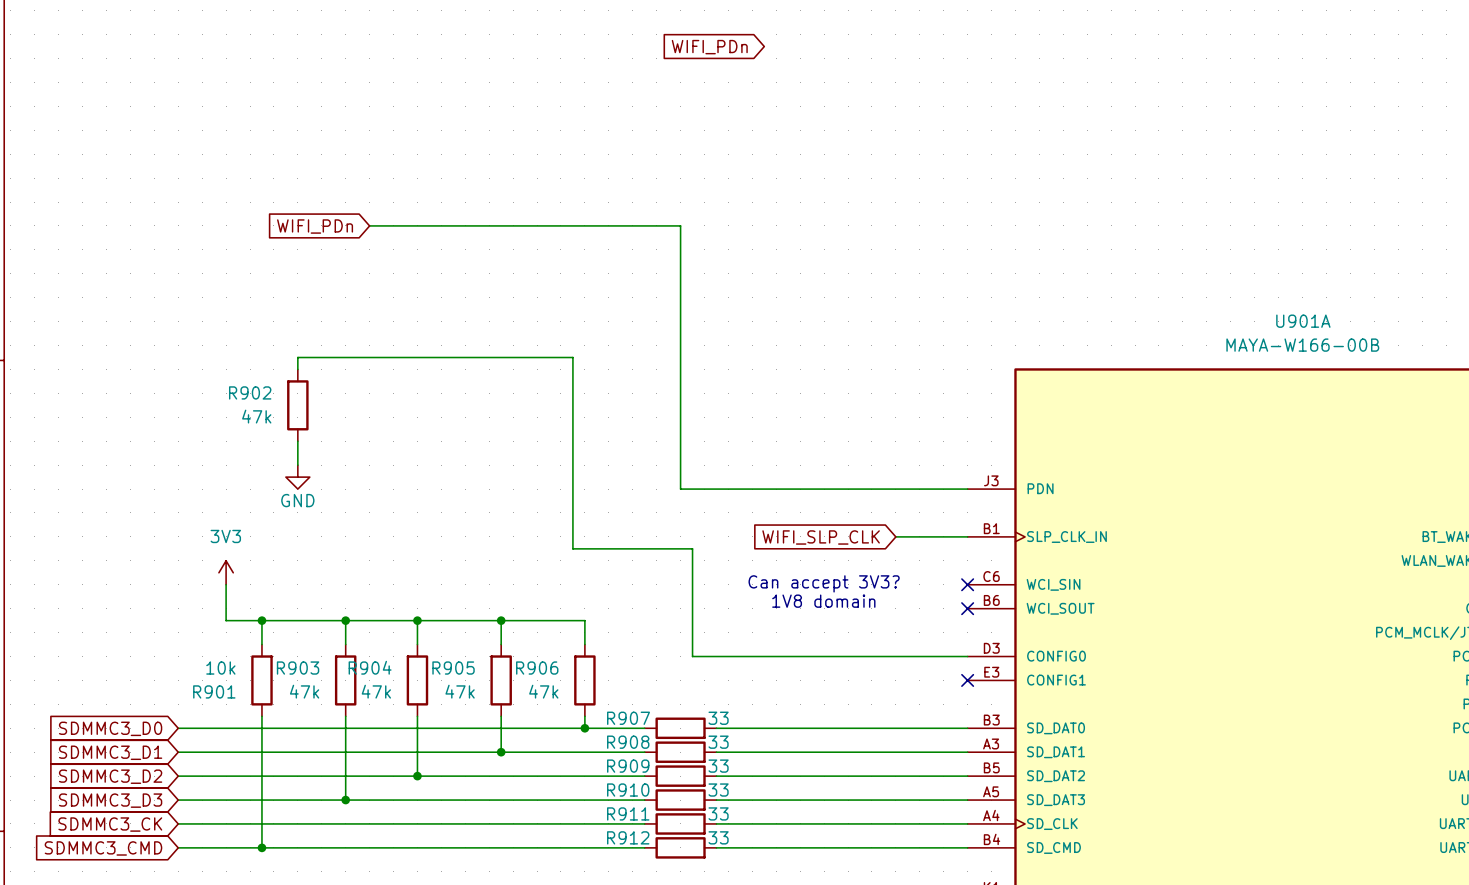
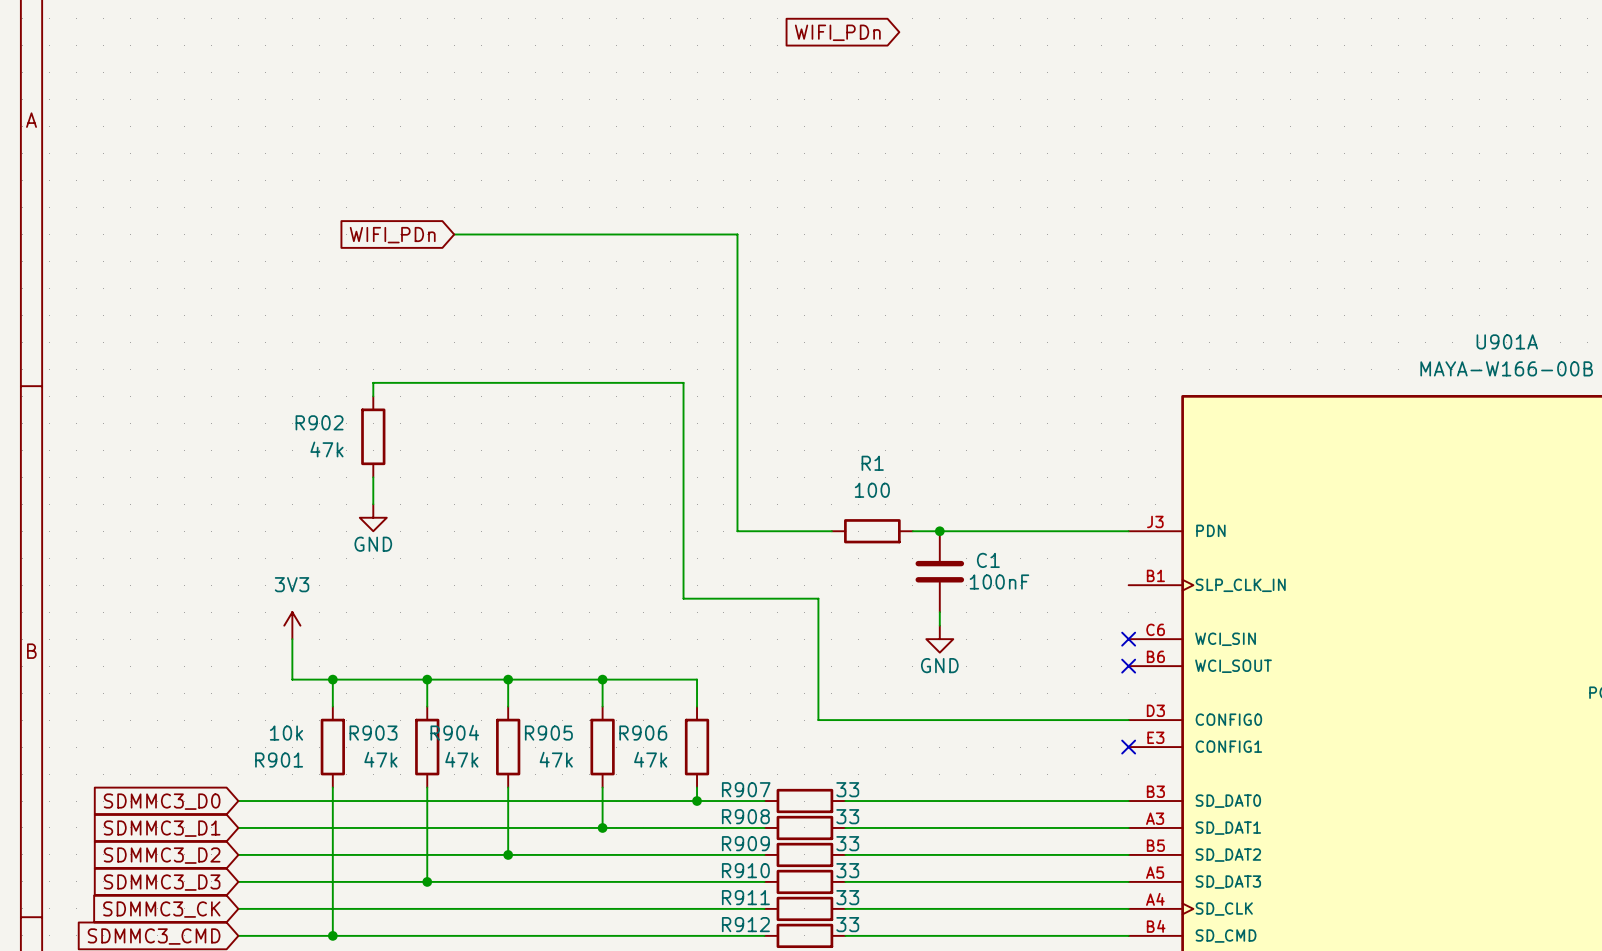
wire: (620, 225) (680, 225) (680, 489) -> (737, 234) (737, 531) (804, 531)
wire: (704, 489) (776, 489) -> none
R1: none -> 100 (872, 531)
junction: none -> (939, 531)
C1: none -> 100nF (939, 571)
wire: (895, 536) (967, 536) -> none
global label: WIFI_SLP_CLK (821, 537) -> none
wire: none -> (939, 612) (939, 625)
text: Can accept 3V3? (824, 583) -> none
power symbol: none -> GND (939, 639)
text: 1V8 domain (823, 601) -> none

